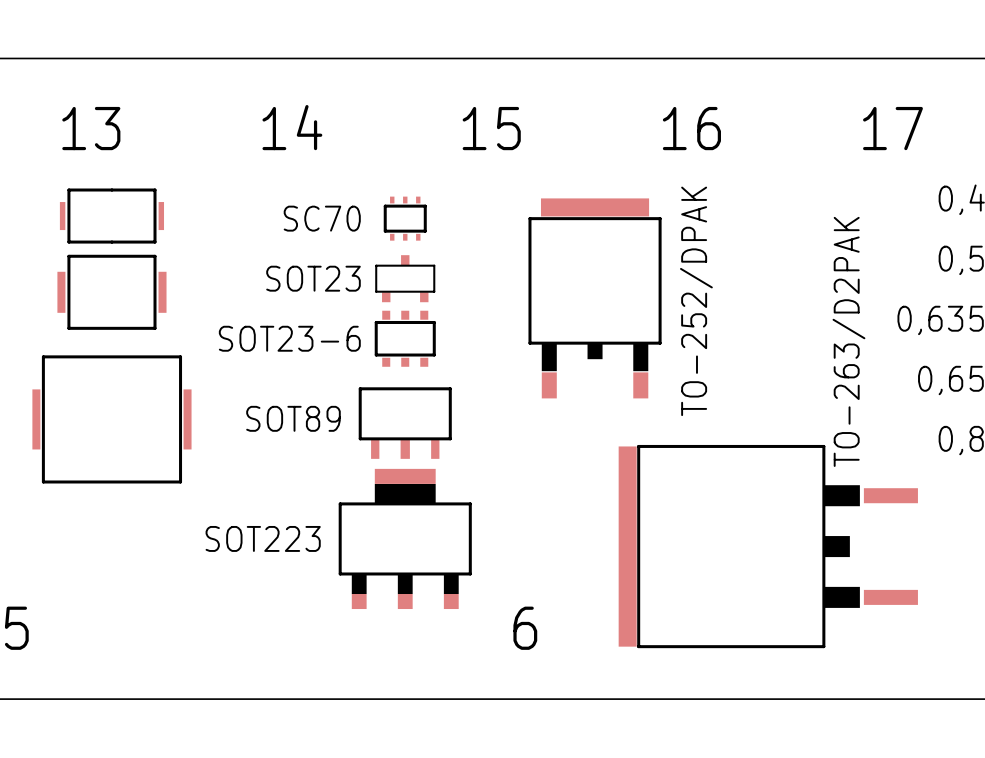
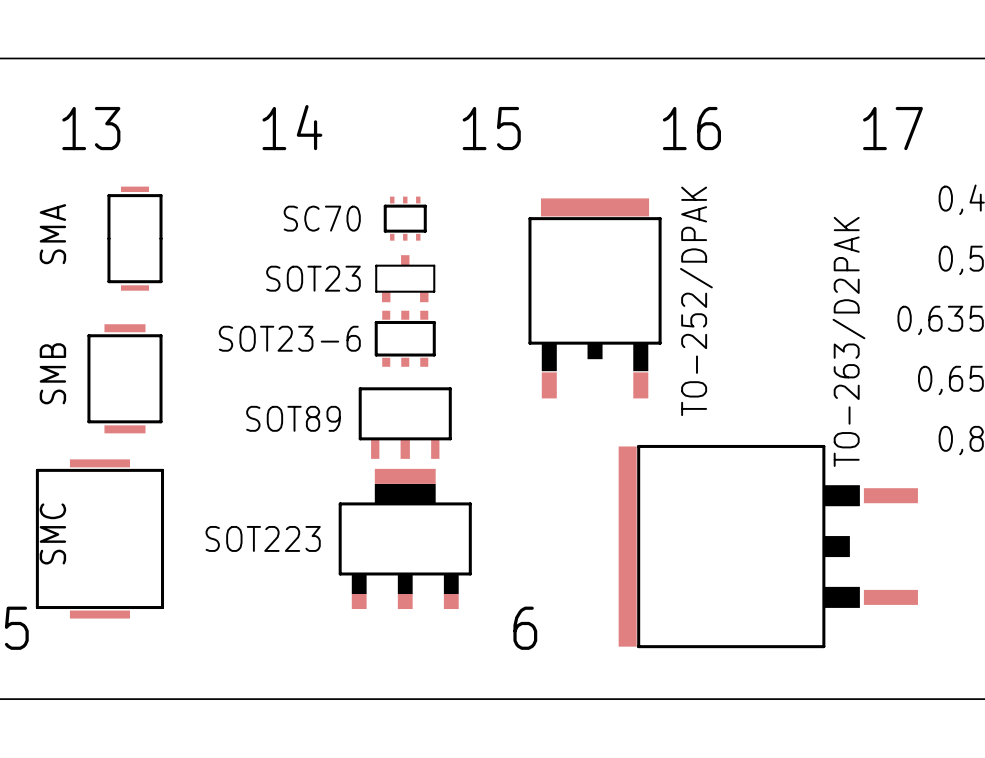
part rotation: 0° (111, 216) -> 90° clockwise (134, 238)
text: none -> SMA (52, 234)
part rotation: 0° (111, 292) -> 90° clockwise (124, 378)
part position: (111, 292) -> (124, 378)
text: none -> SMB (52, 373)
part rotation: 0° (111, 419) -> 90° clockwise (99, 538)
part position: (111, 419) -> (99, 538)
text: none -> SMC (52, 533)

